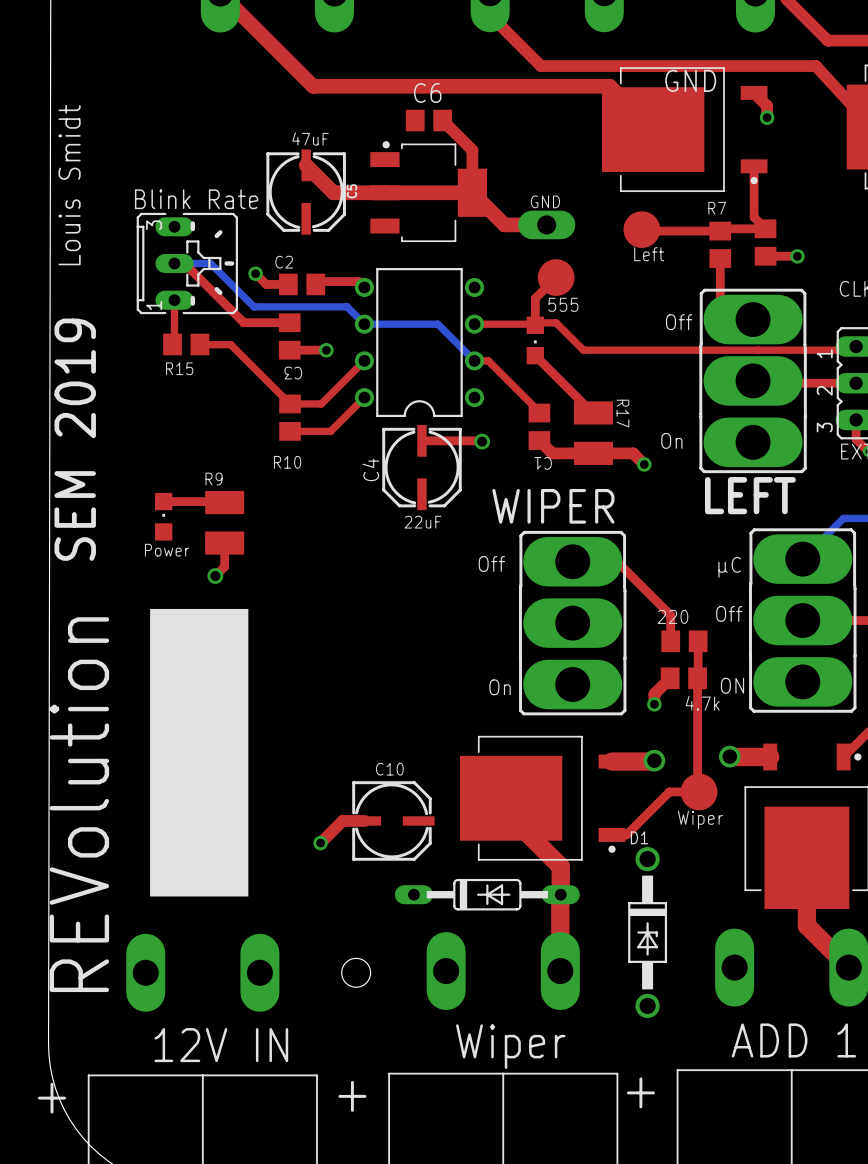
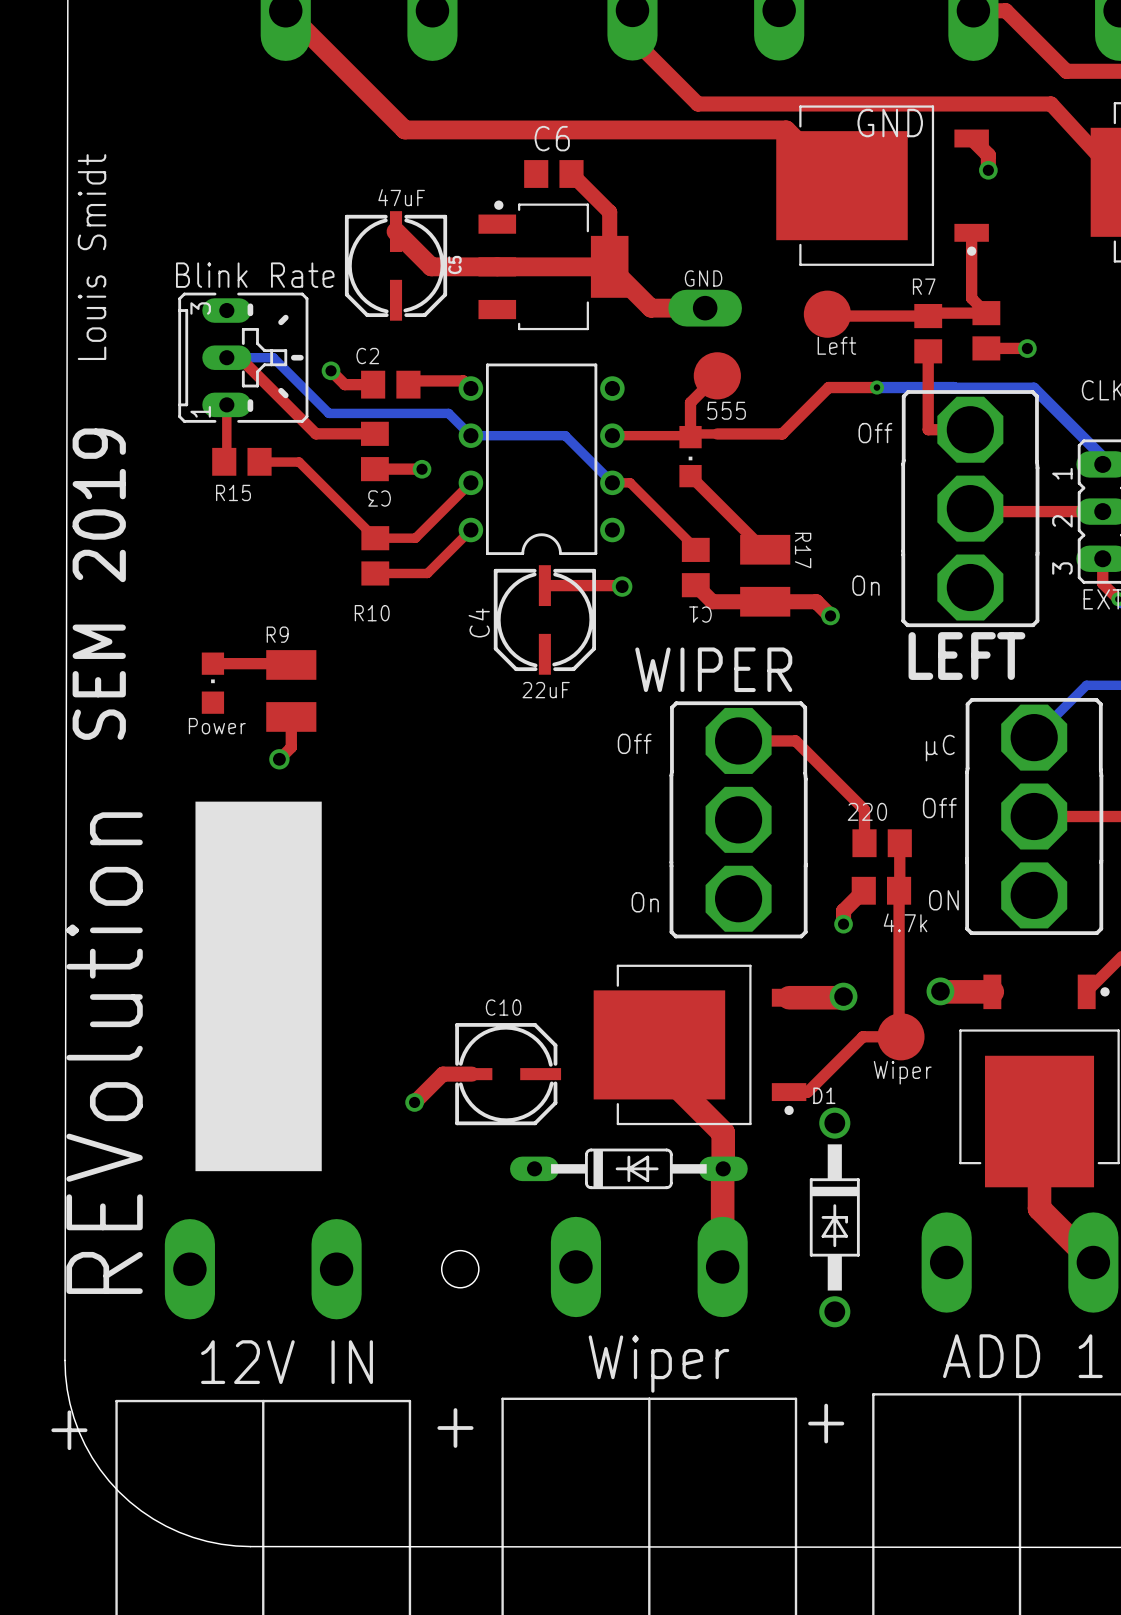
bottom track: none -> (876, 387) (1033, 388) (1102, 457) (1102, 464)
via: none -> (876, 387)
LEFT footprint: [699, 288, 807, 474] -> [901, 390, 1040, 628]
top track: (556, 322) (583, 350) (852, 350) (856, 346) -> (717, 433) (782, 433) (828, 387) (876, 387)
part footprint: [749, 528, 857, 713] -> [965, 698, 1104, 936]
WIPER footprint: [518, 530, 627, 716] -> [669, 701, 808, 939]

